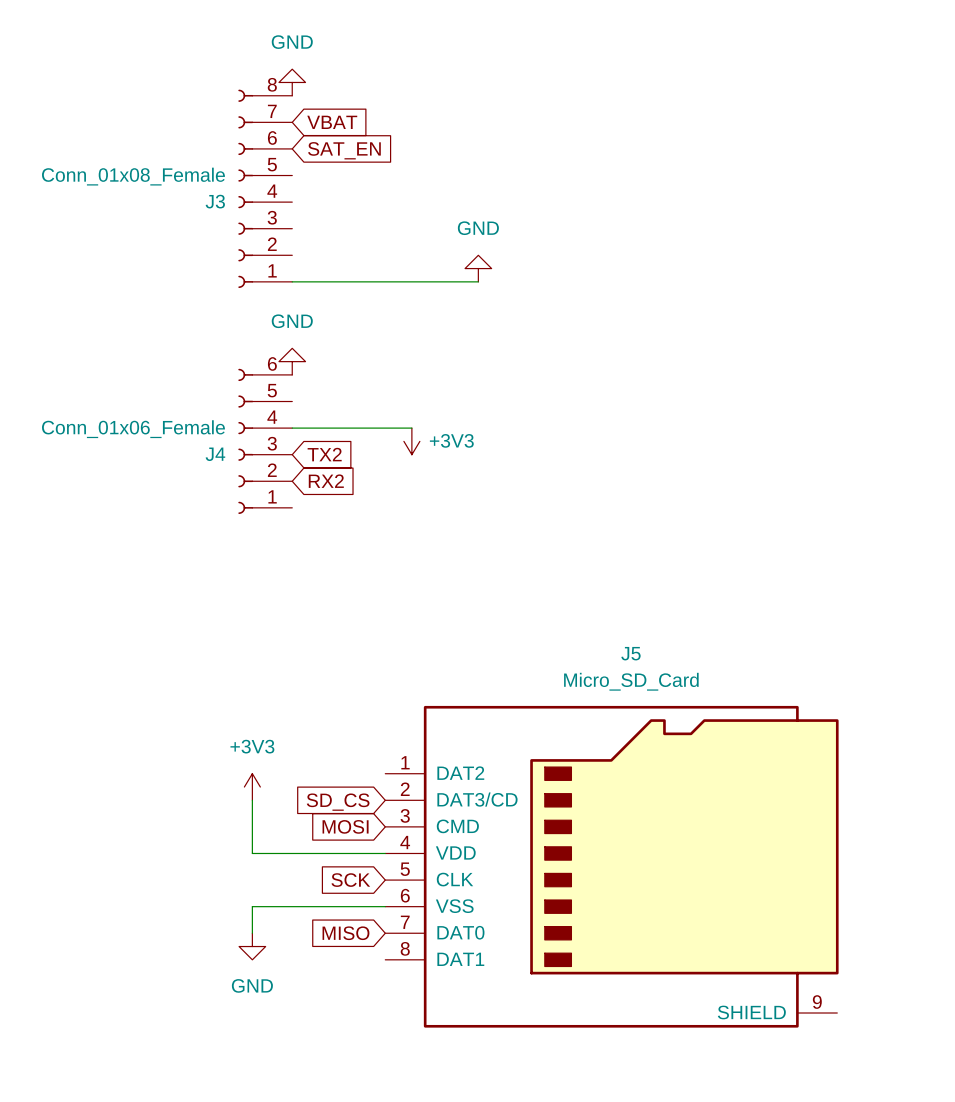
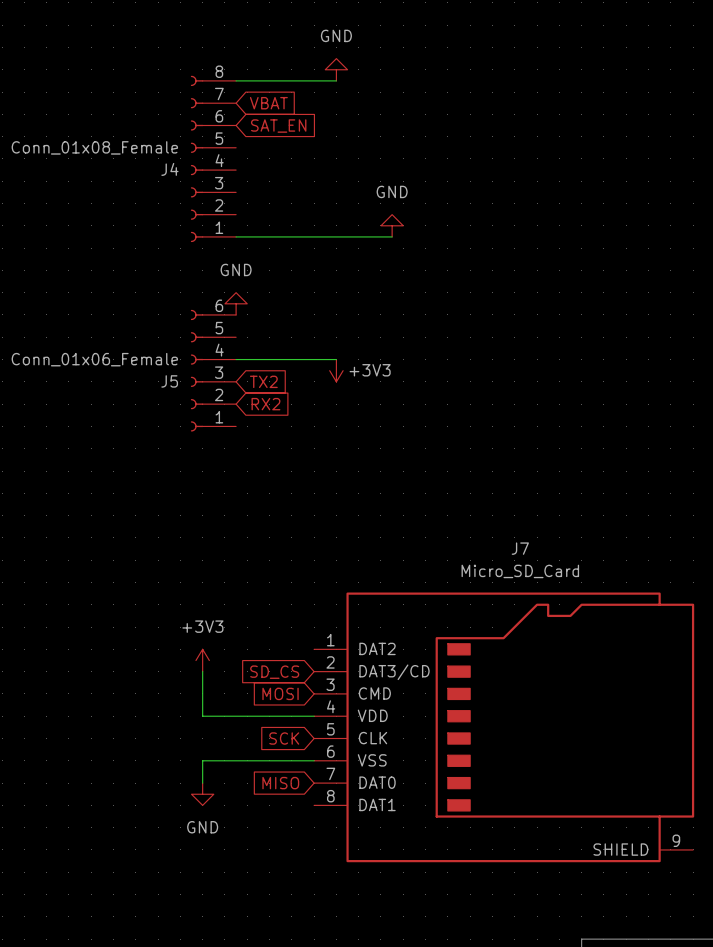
power symbol position: GND (292, 82) -> GND (336, 69)
wire: none -> (236, 80) (336, 80)
J3 name: J3 (215, 201) -> J4 (169, 169)
J4 name: J4 (215, 454) -> J5 (169, 381)
J5 name: J5 (630, 653) -> J7 (520, 548)

